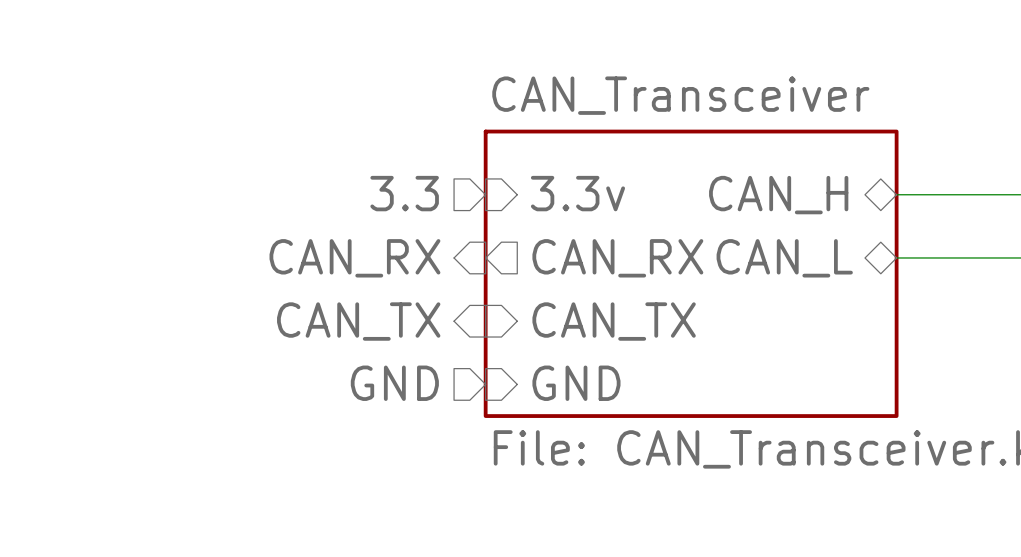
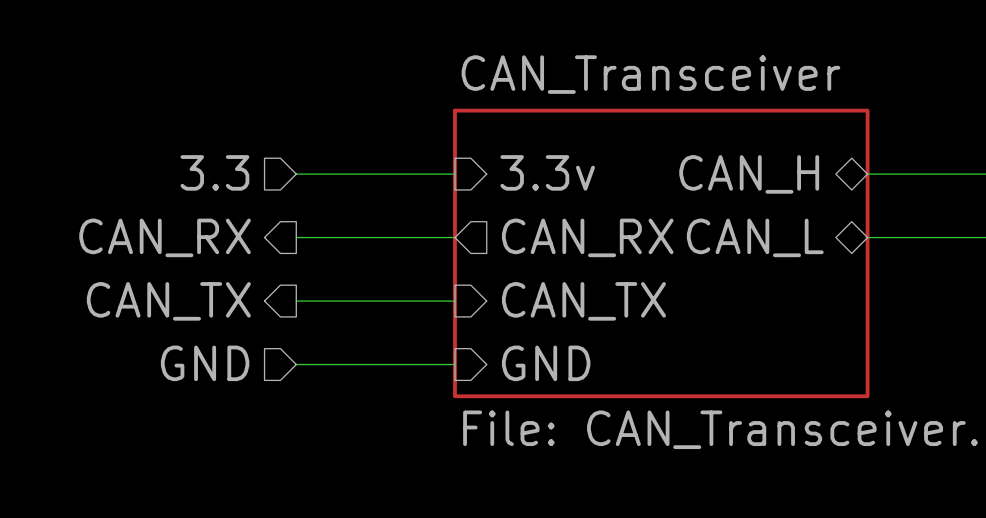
hierarchical label position: 3.3 (404, 193) -> 3.3 (214, 172)
wire: none -> (296, 174) (454, 174)
wire: none -> (296, 237) (454, 237)
hierarchical label position: CAN_RX (354, 258) -> CAN_RX (165, 237)
wire: none -> (296, 301) (454, 301)
hierarchical label position: CAN_TX (358, 321) -> CAN_TX (168, 301)
hierarchical label position: GND (394, 383) -> GND (205, 363)
wire: none -> (296, 364) (454, 364)

